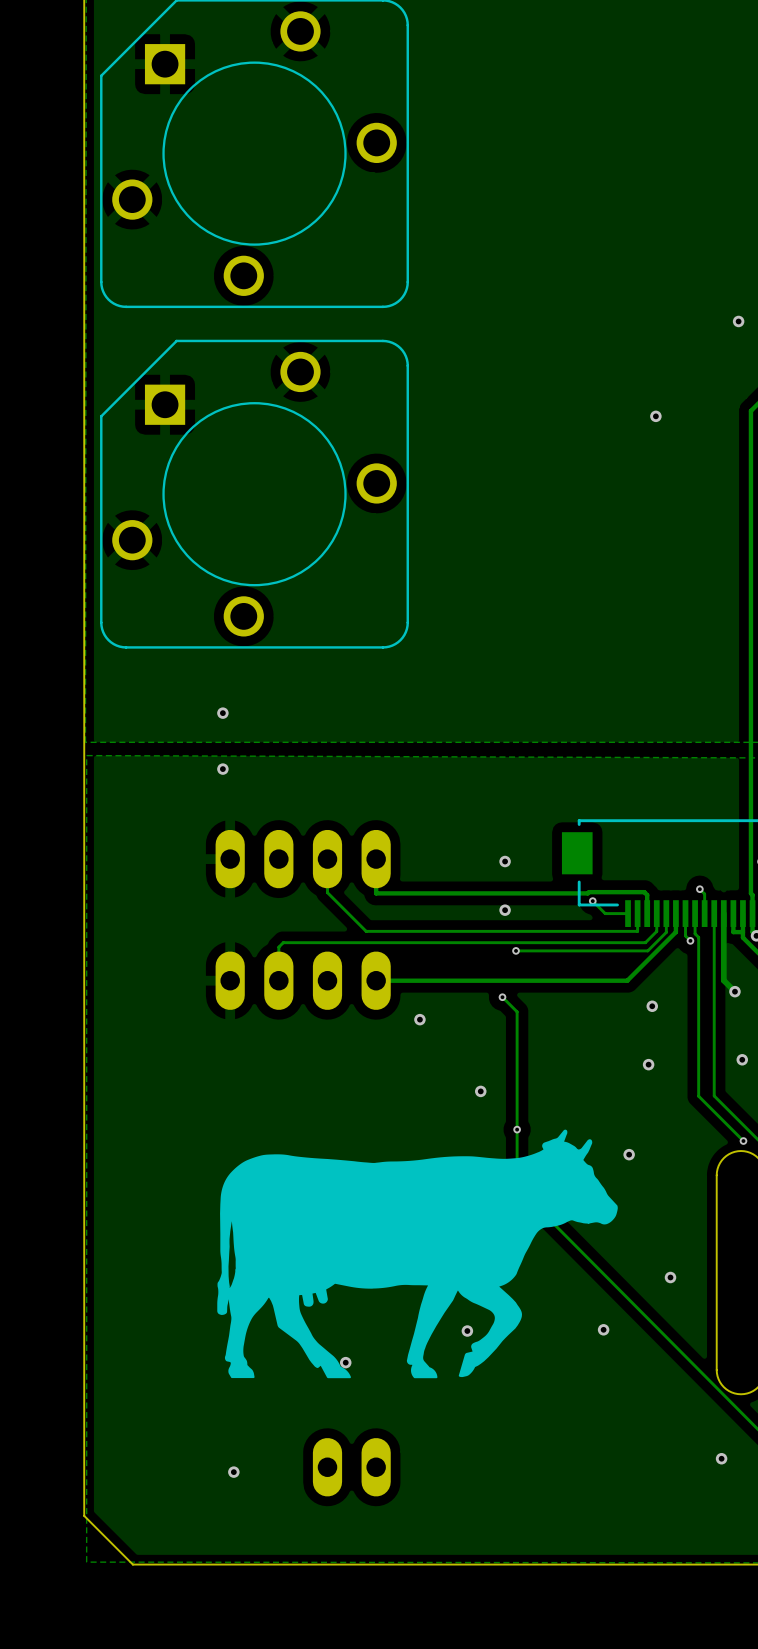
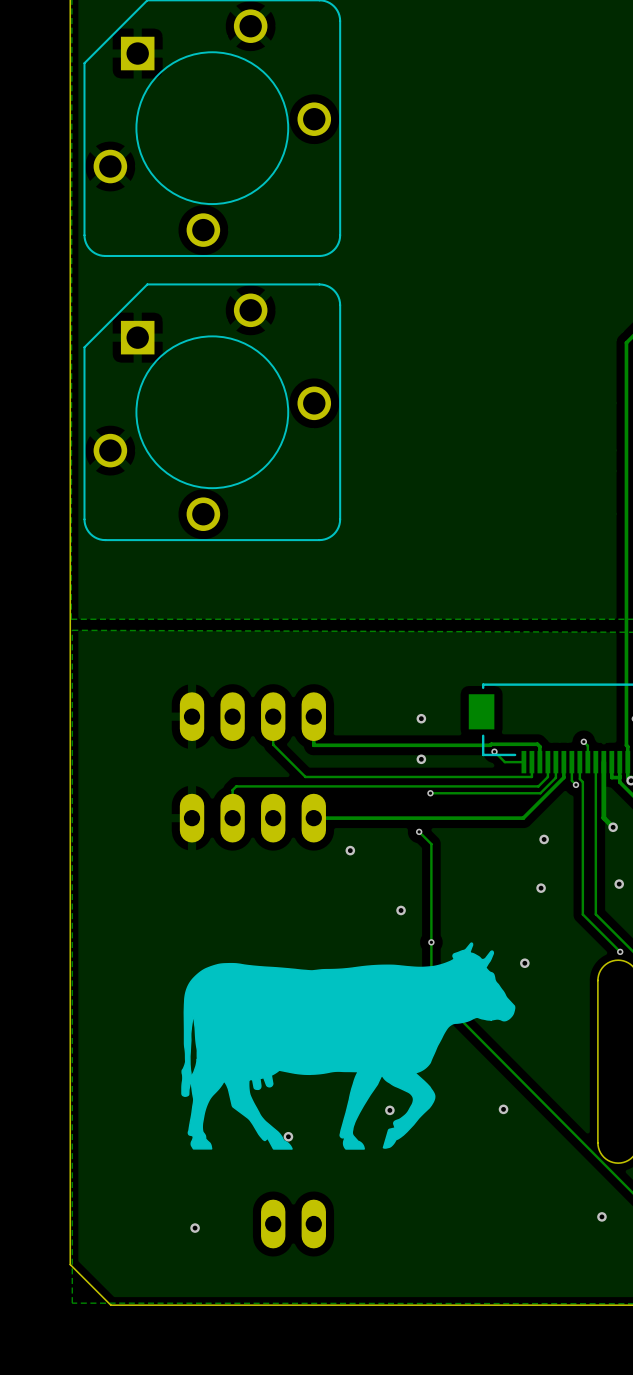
via: (738, 321) -> none
via: (655, 416) -> none
via: (222, 713) -> none
via: (222, 769) -> none
via: (670, 1277) -> none

